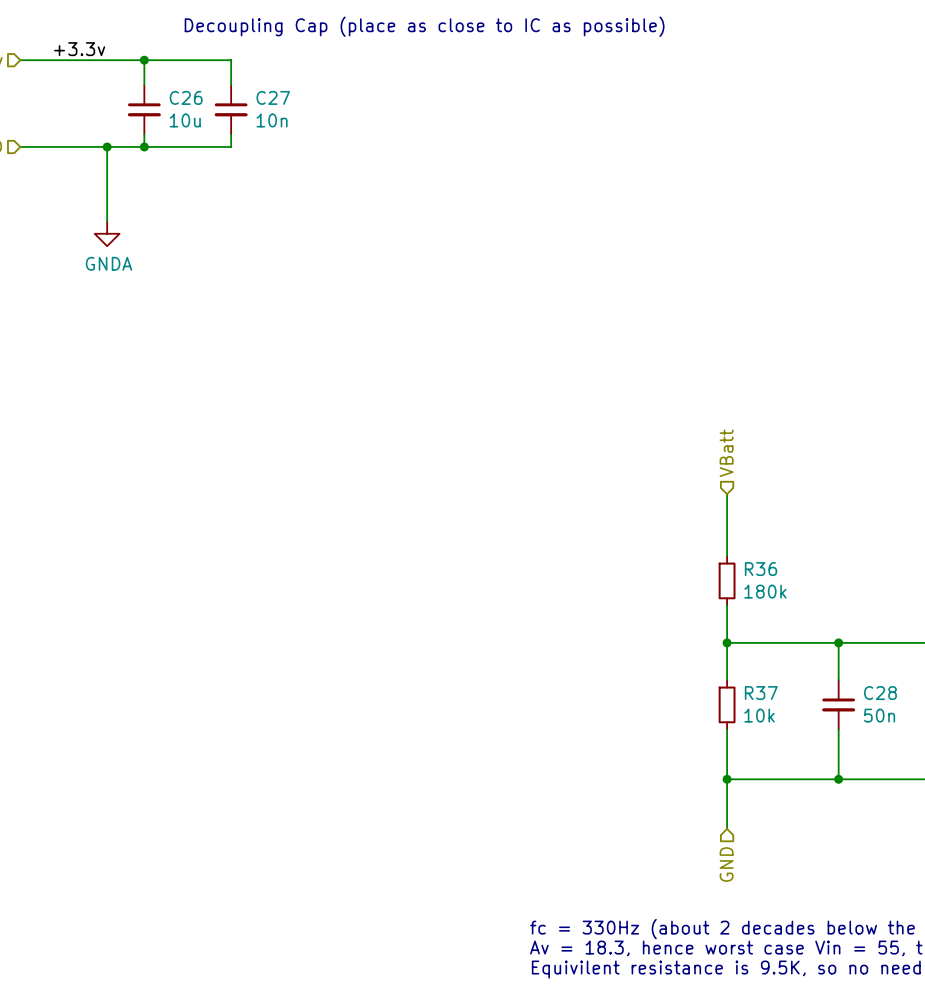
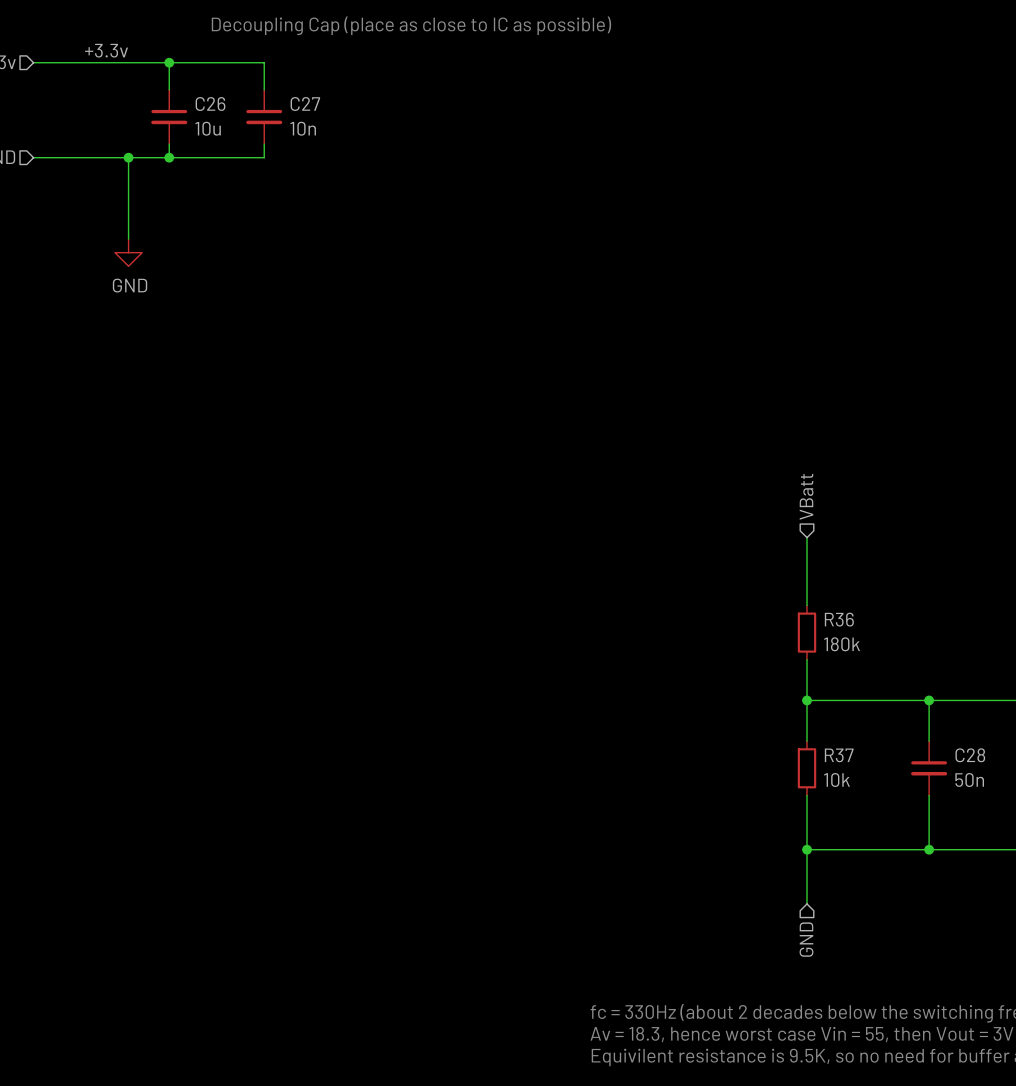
power symbol: GNDA (107, 233) -> GND (128, 252)

